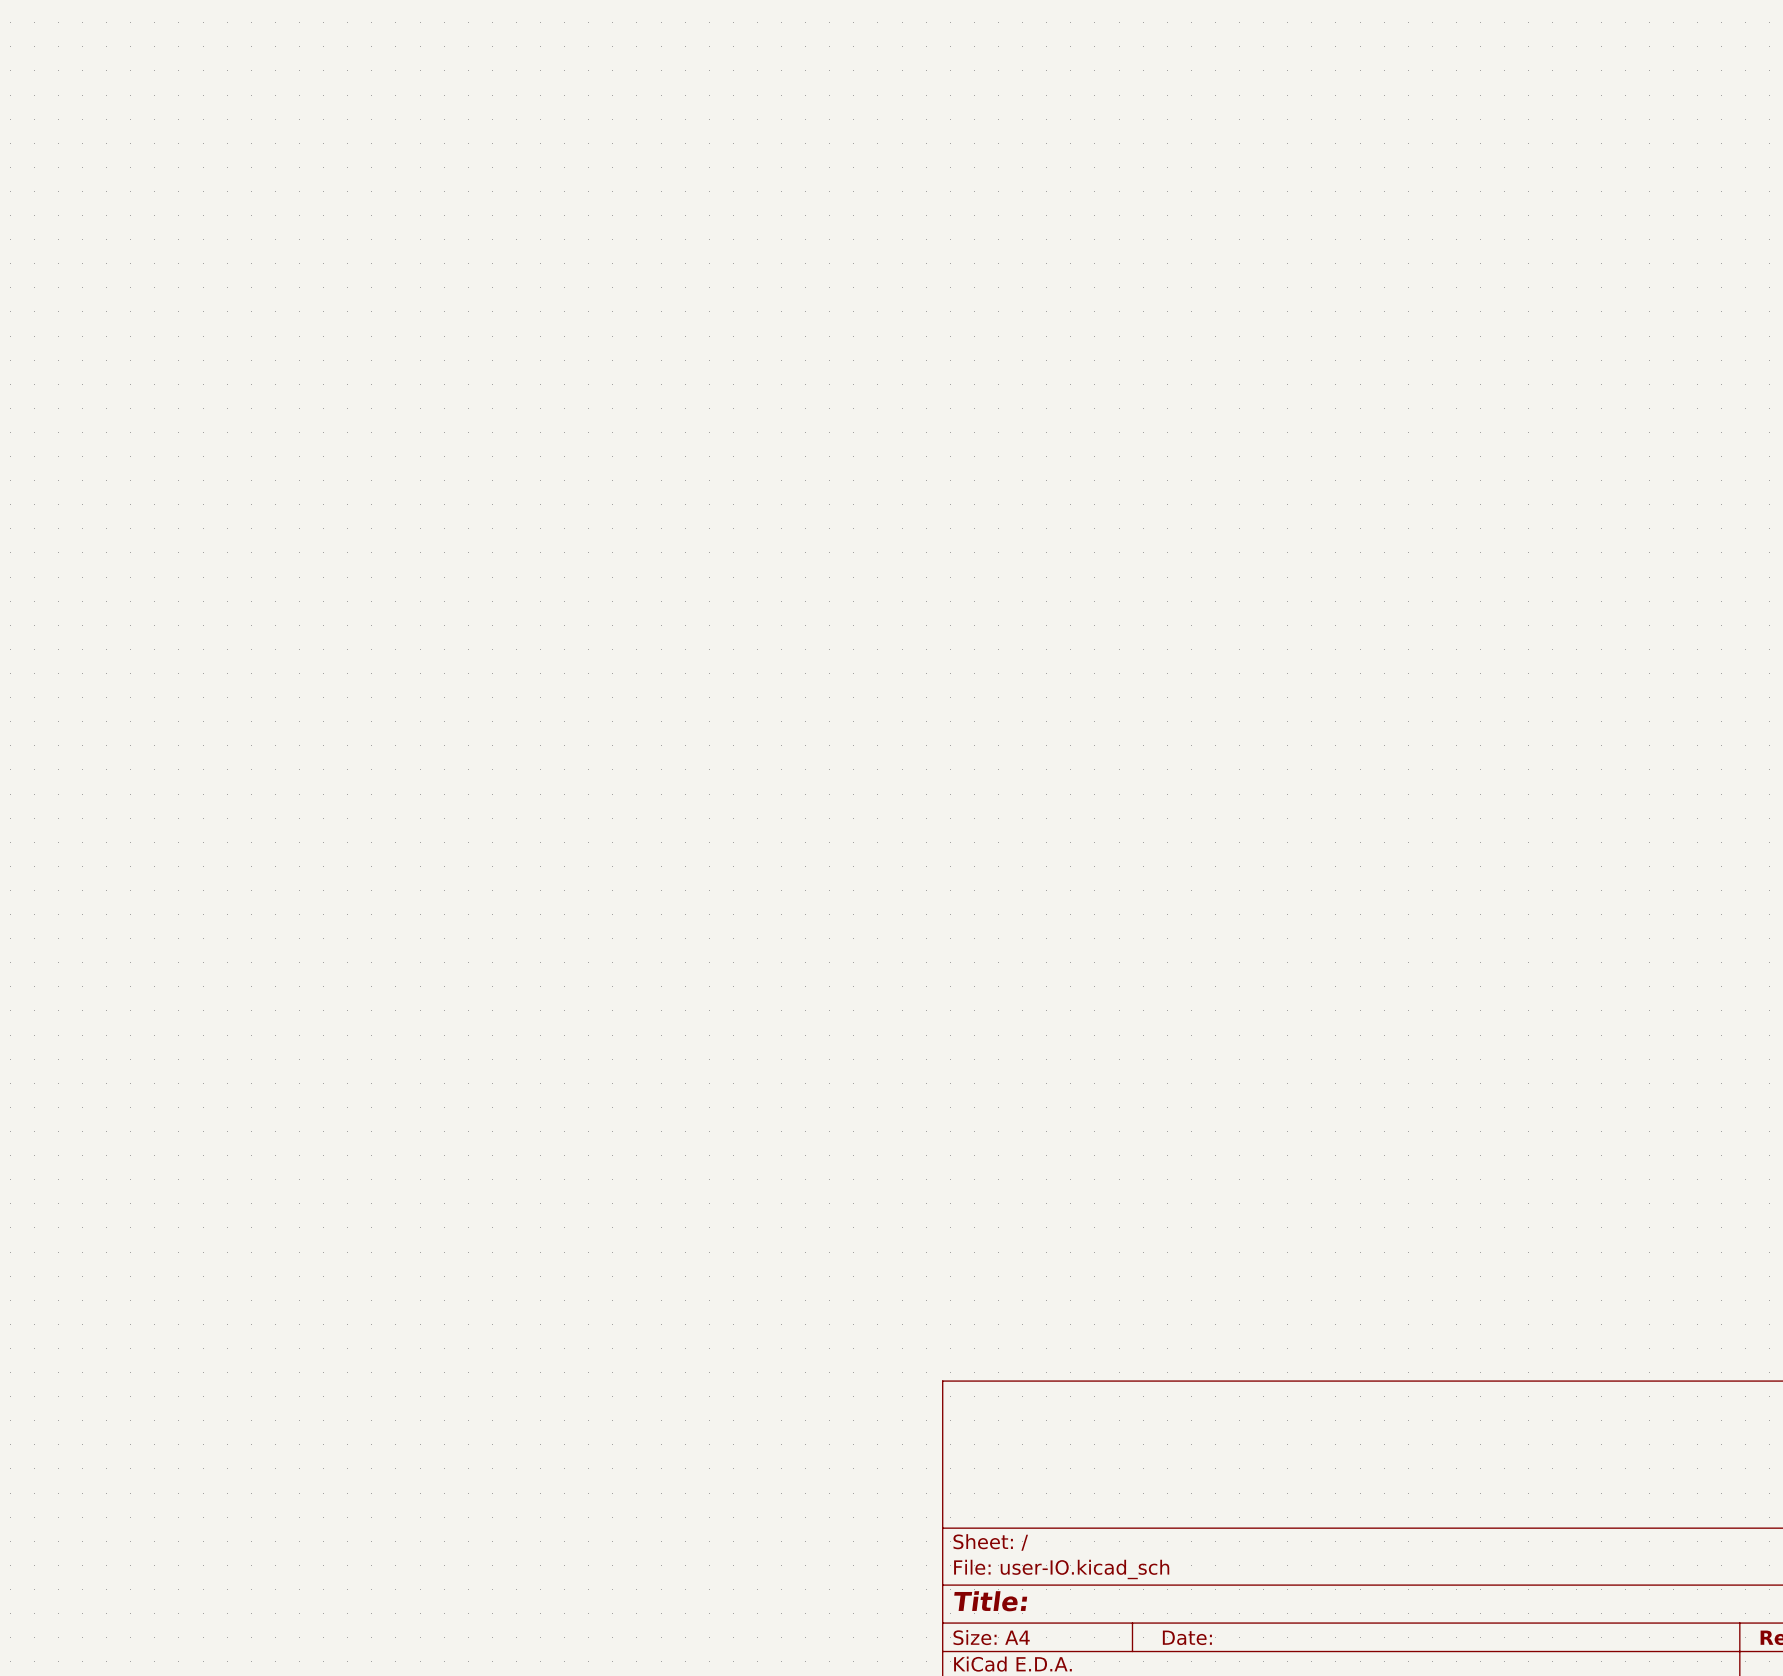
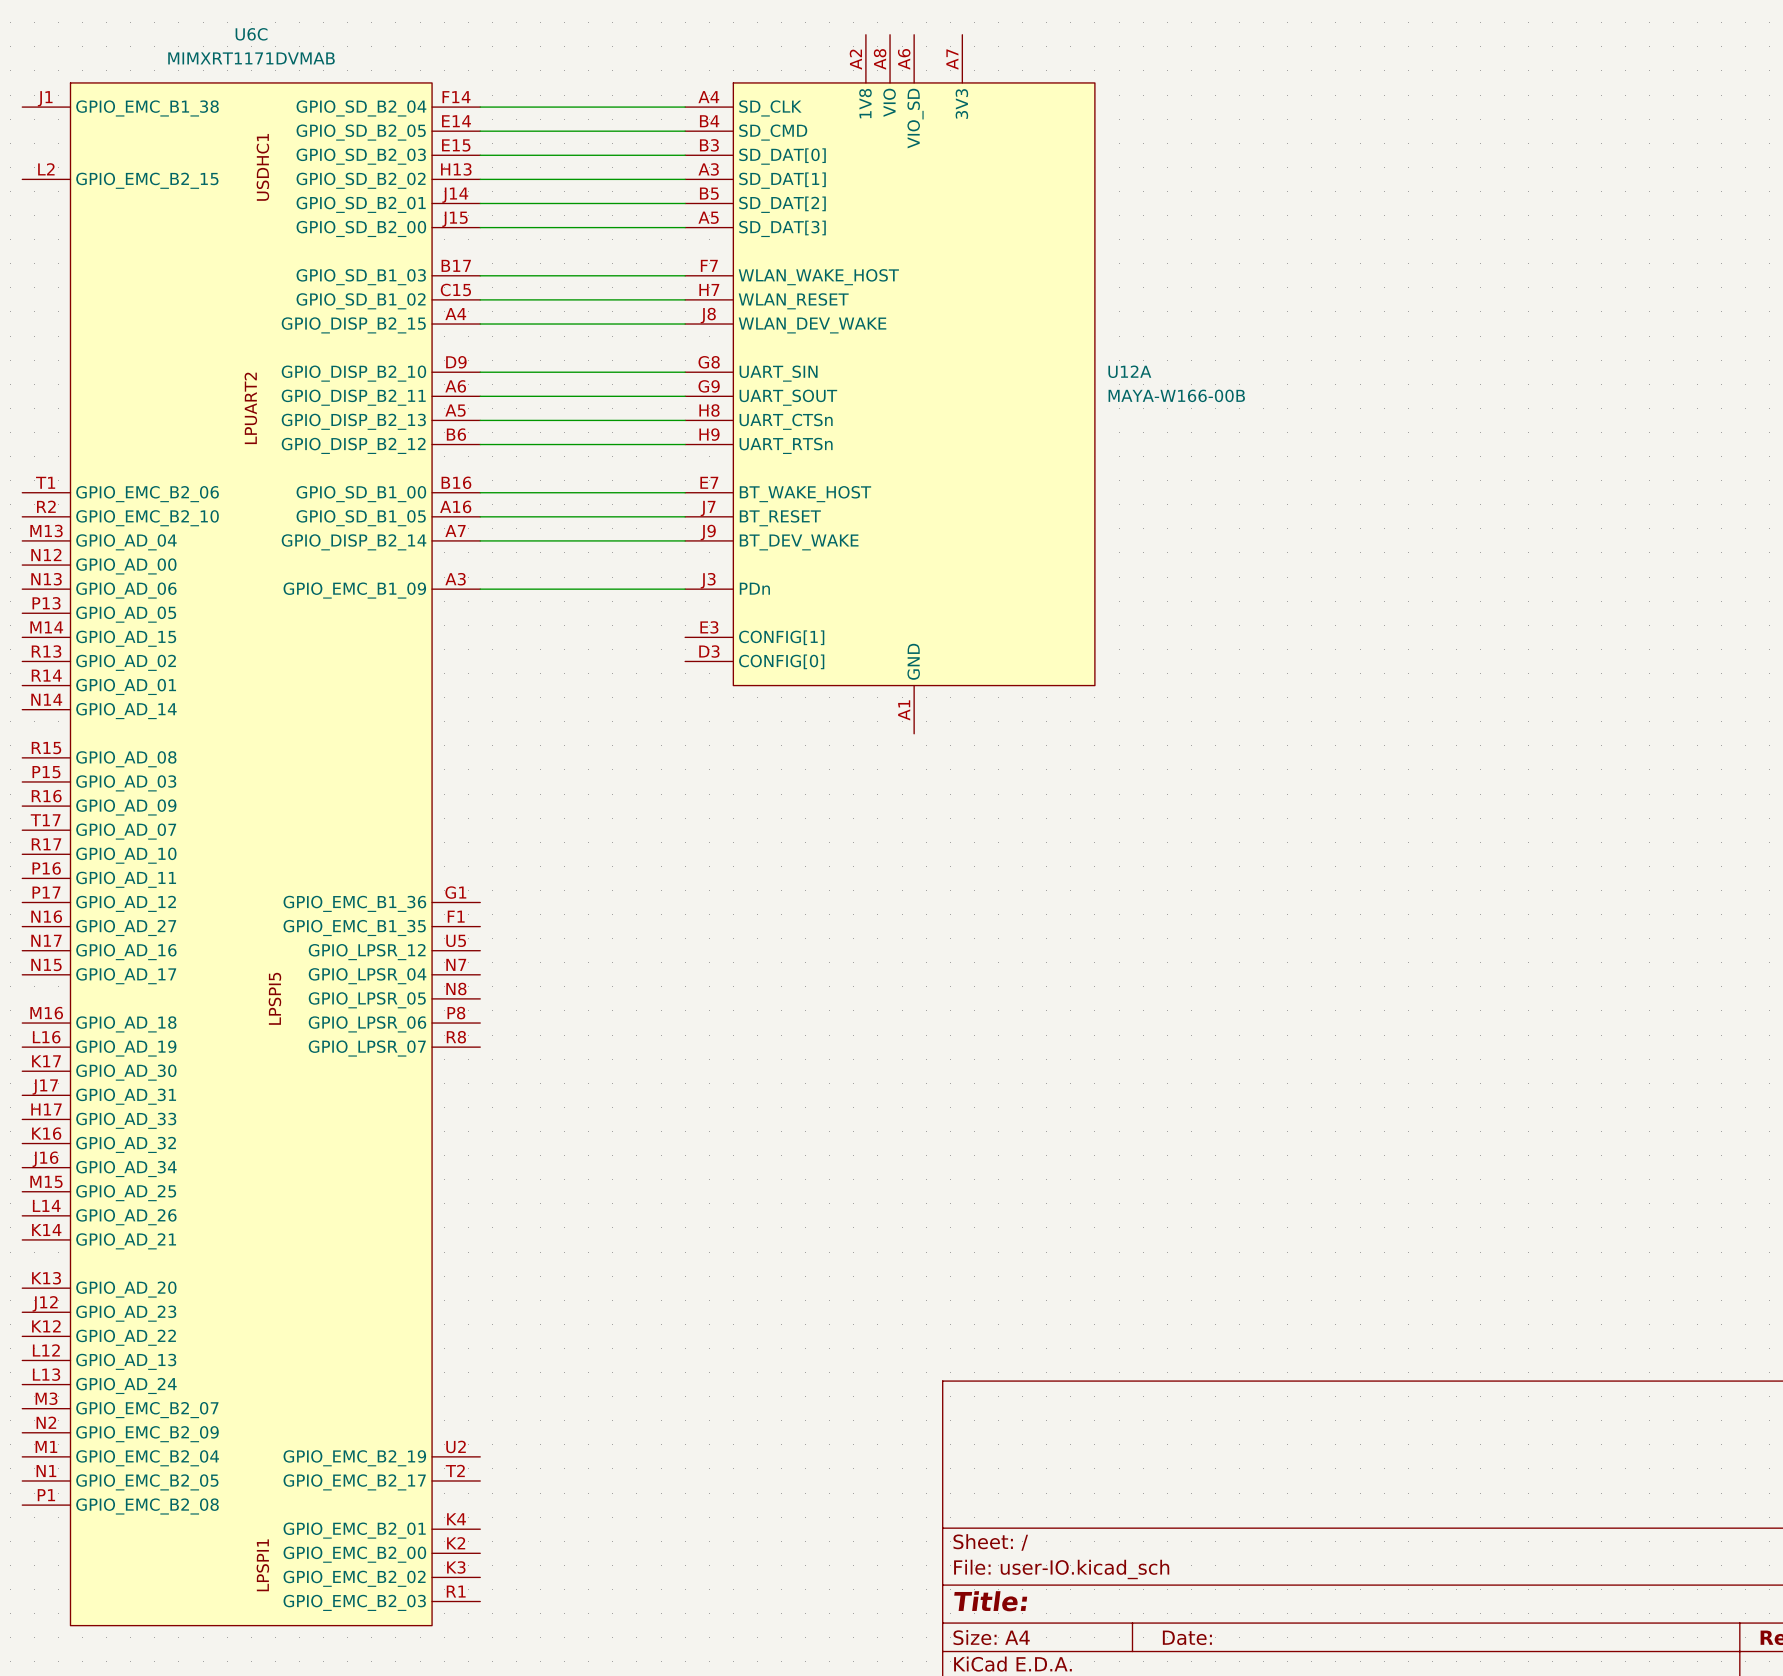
wire: none -> (480, 107) (685, 107)
wire: none -> (480, 131) (685, 131)
wire: none -> (480, 155) (685, 155)
wire: none -> (480, 179) (685, 179)
wire: none -> (480, 203) (685, 203)
wire: none -> (480, 227) (685, 227)
wire: none -> (480, 275) (685, 275)
wire: none -> (480, 299) (685, 299)
wire: none -> (480, 324) (685, 324)
wire: none -> (480, 372) (685, 372)
U12A: none -> MAYA-W166-00B (890, 384)
wire: none -> (480, 396) (685, 396)
wire: none -> (480, 420) (685, 420)
wire: none -> (480, 444) (685, 444)
wire: none -> (480, 492) (685, 492)
wire: none -> (480, 516) (685, 516)
wire: none -> (480, 540) (685, 540)
wire: none -> (480, 589) (685, 589)
U6C: none -> MIMXRT1171DVMAB (251, 854)

